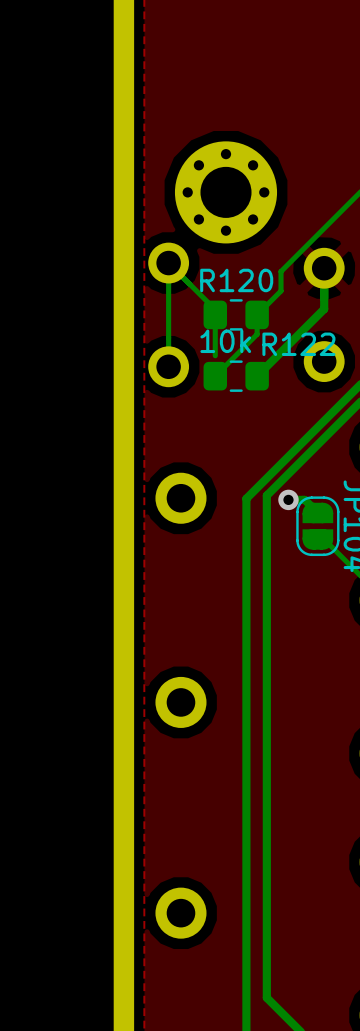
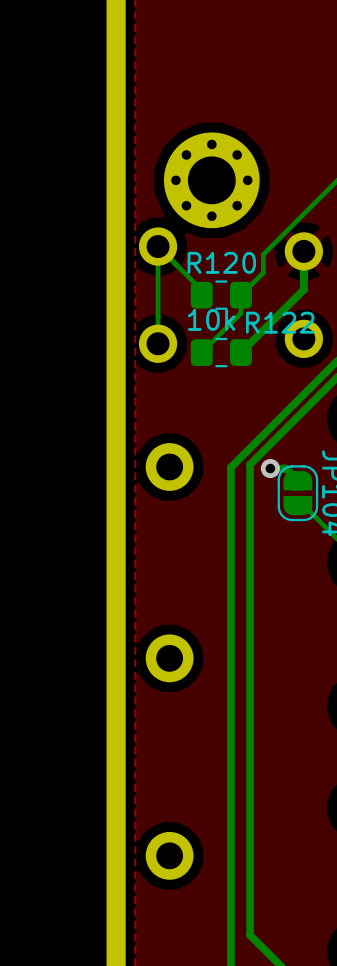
bottom track: (215, 326) (215, 355) -> none

